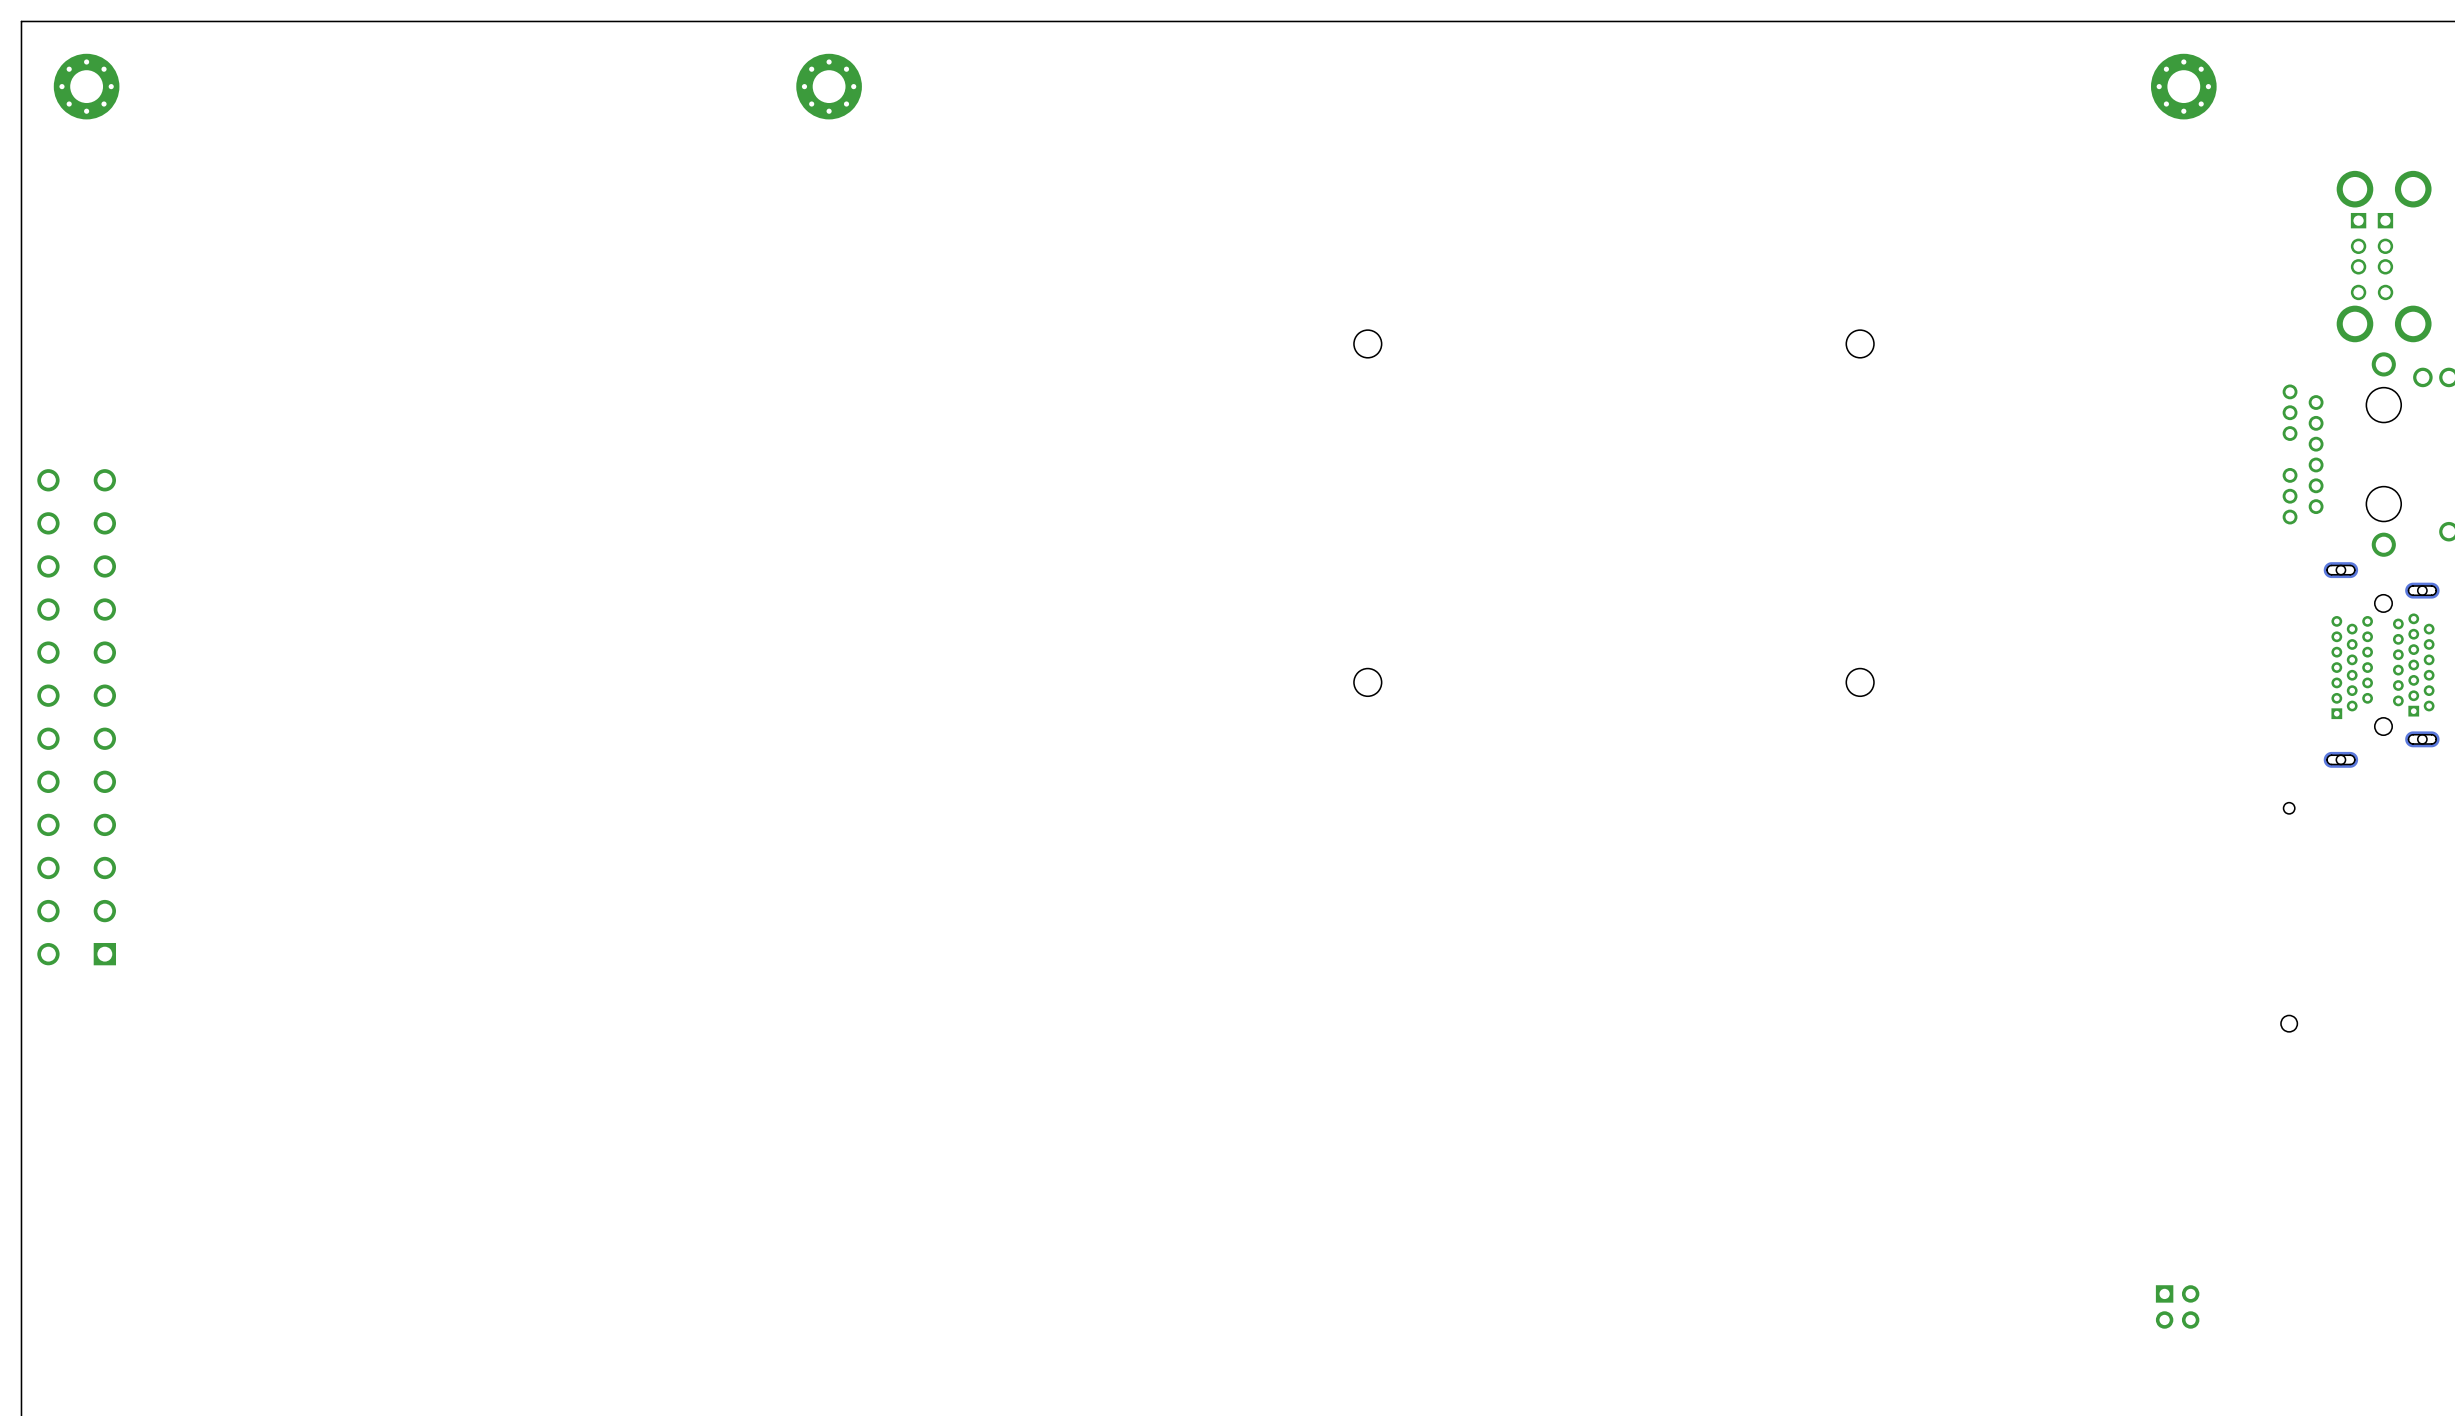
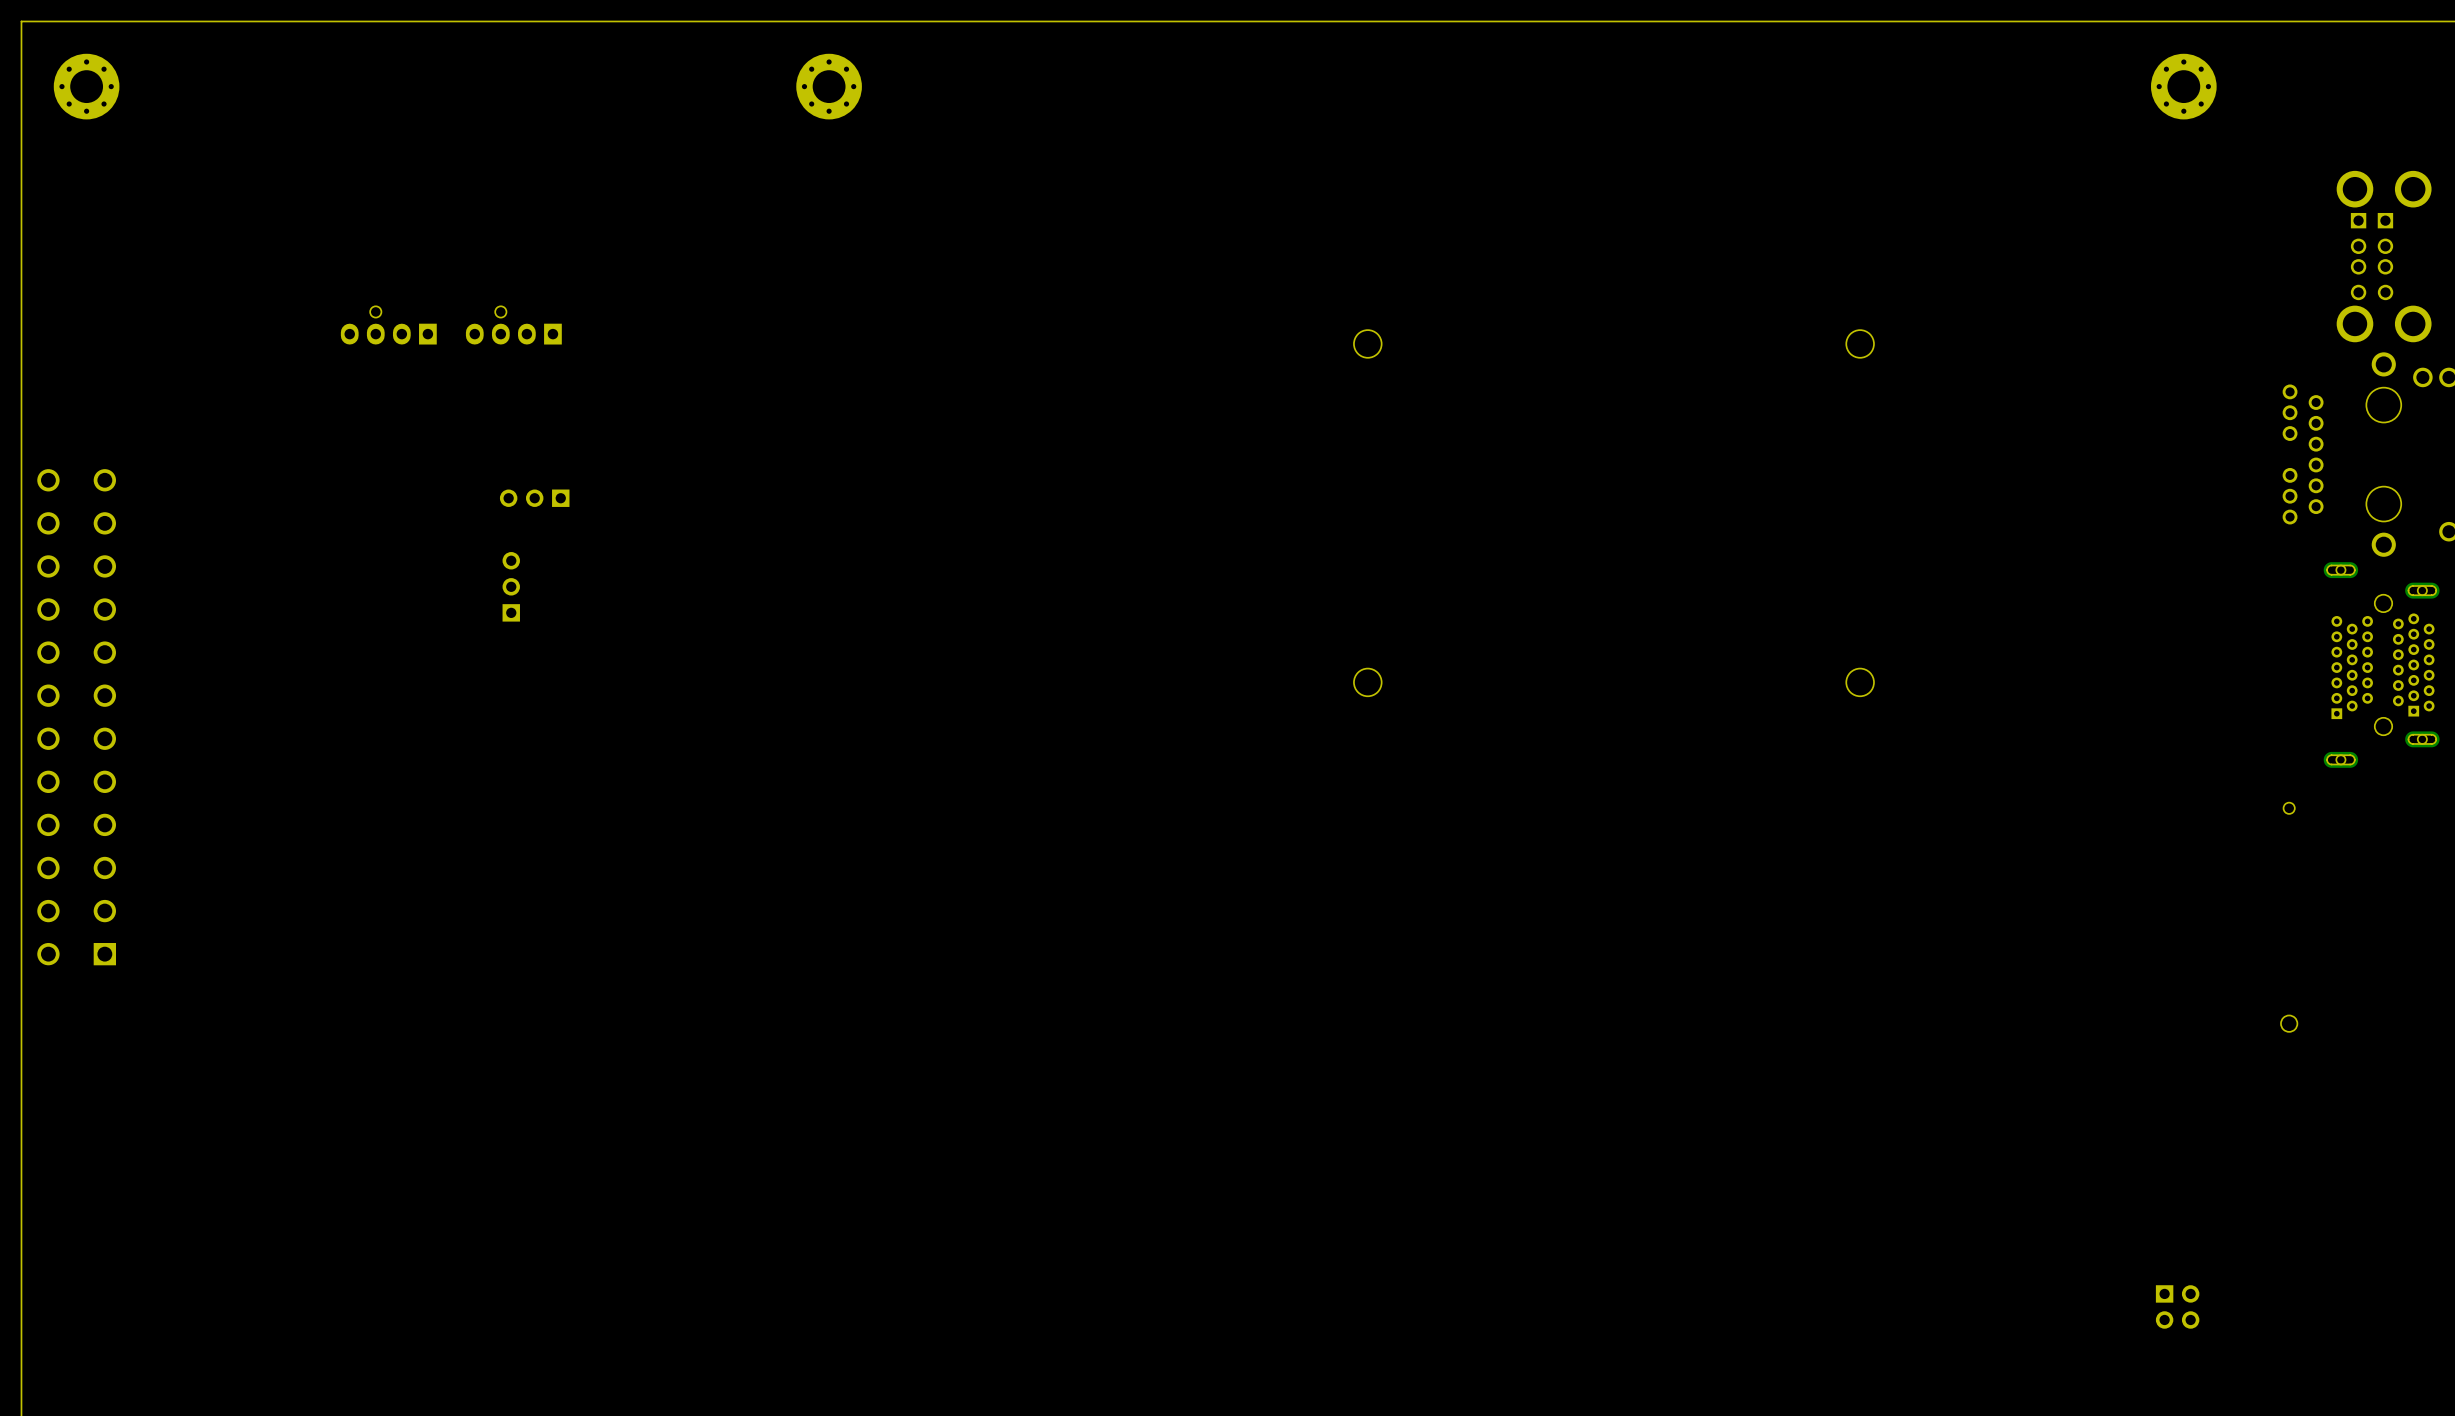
part: none -> (388, 325)
part: none -> (513, 325)
part: none -> (534, 498)
part: none -> (511, 586)

